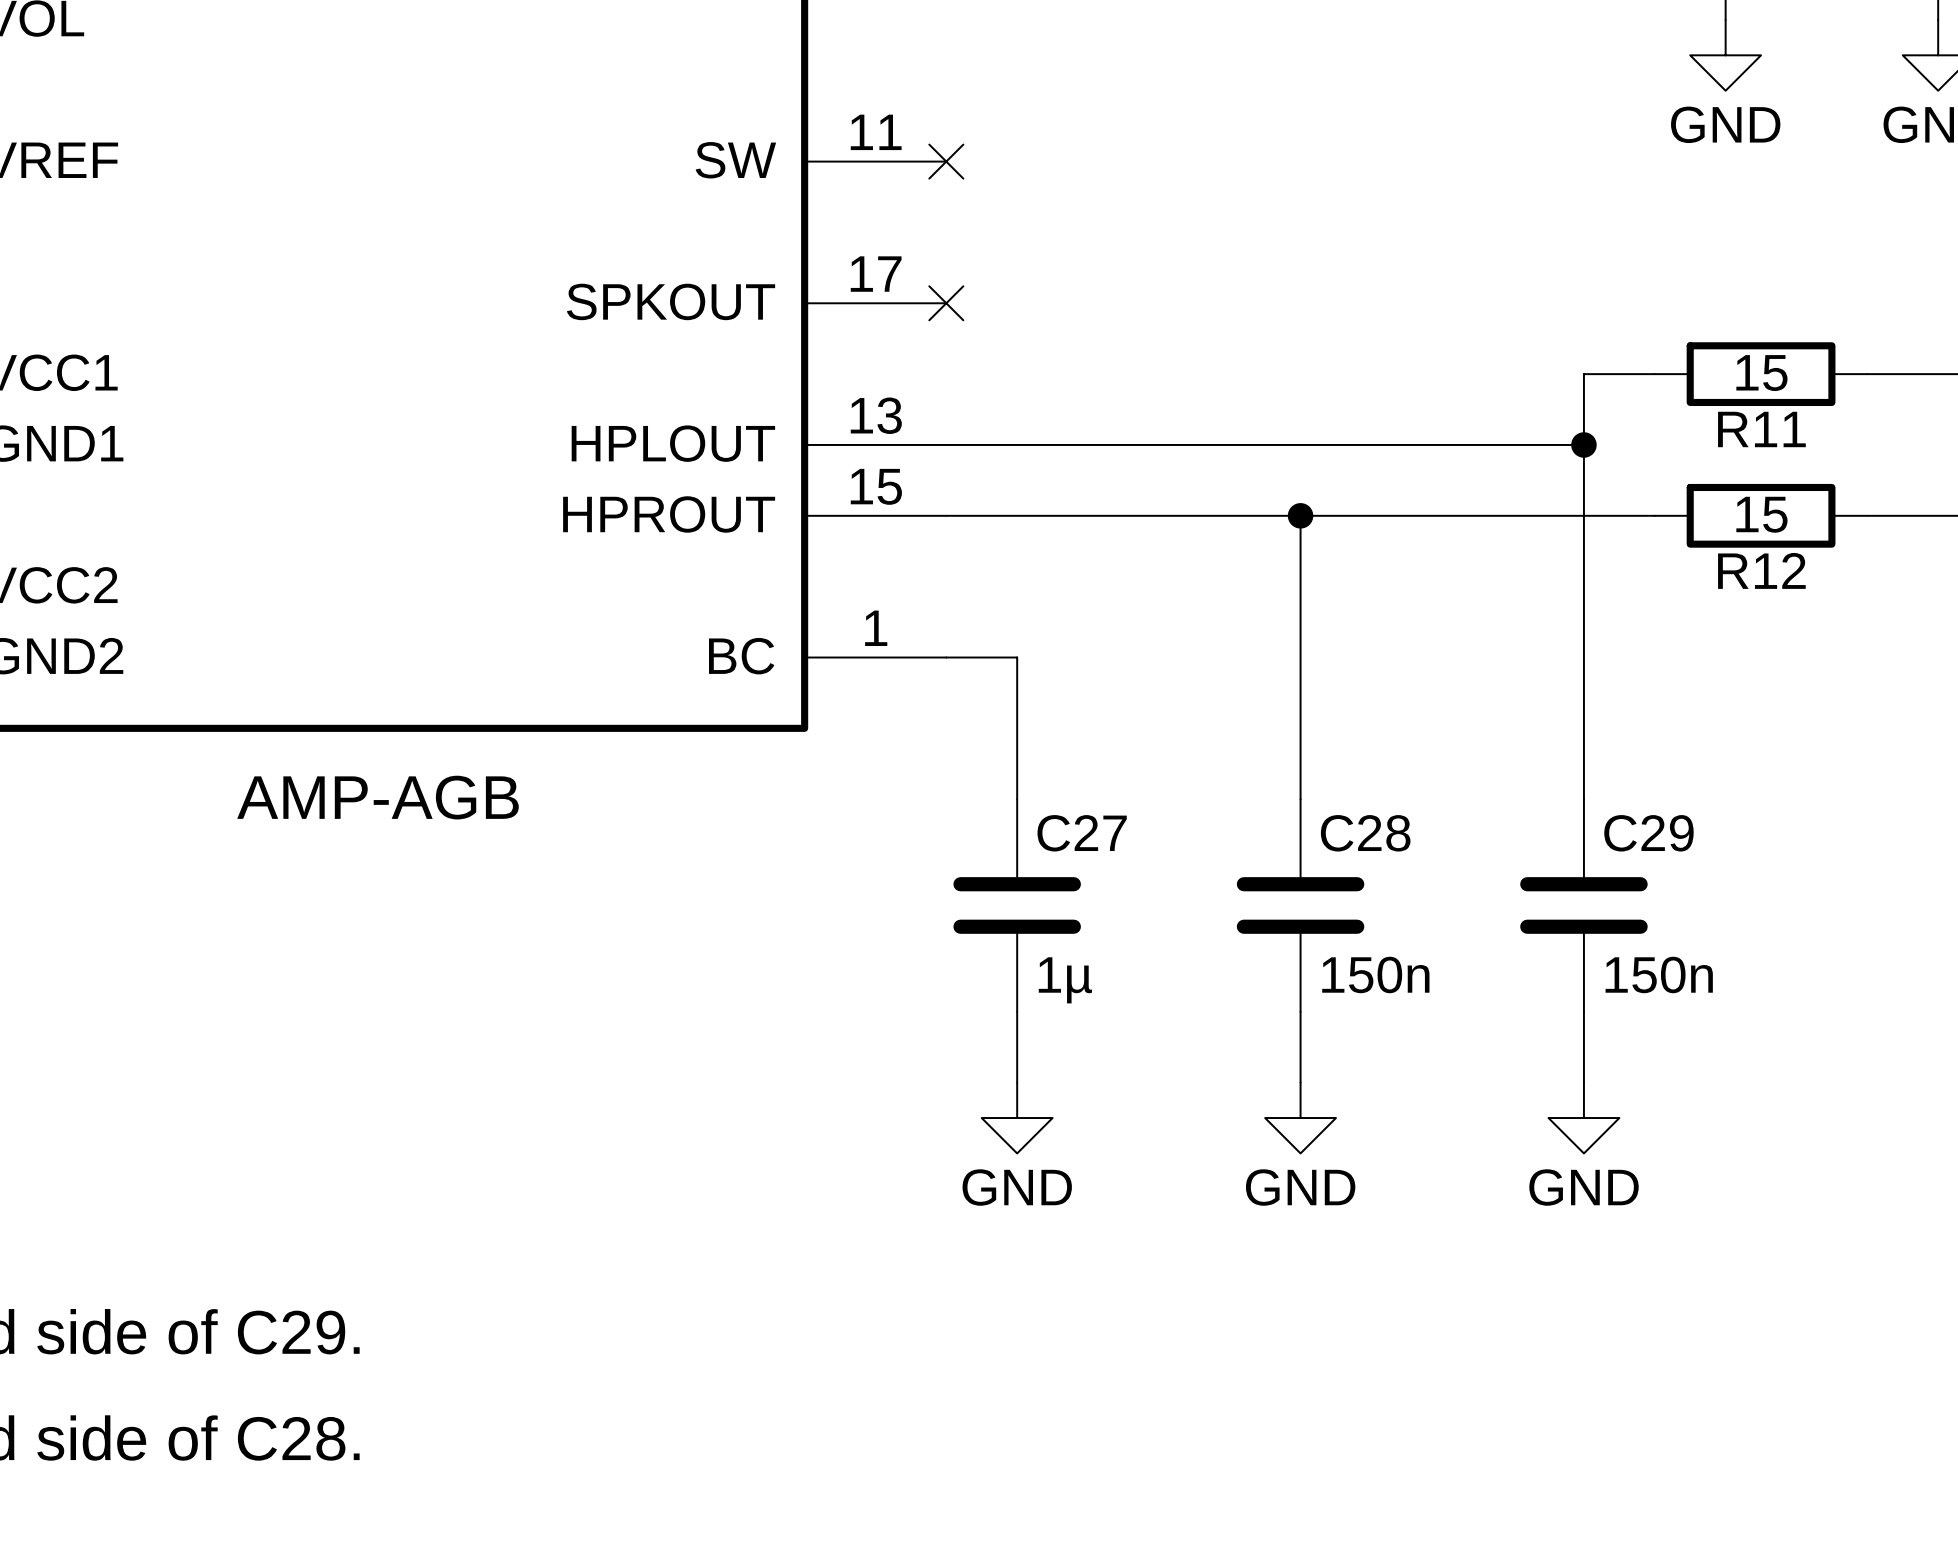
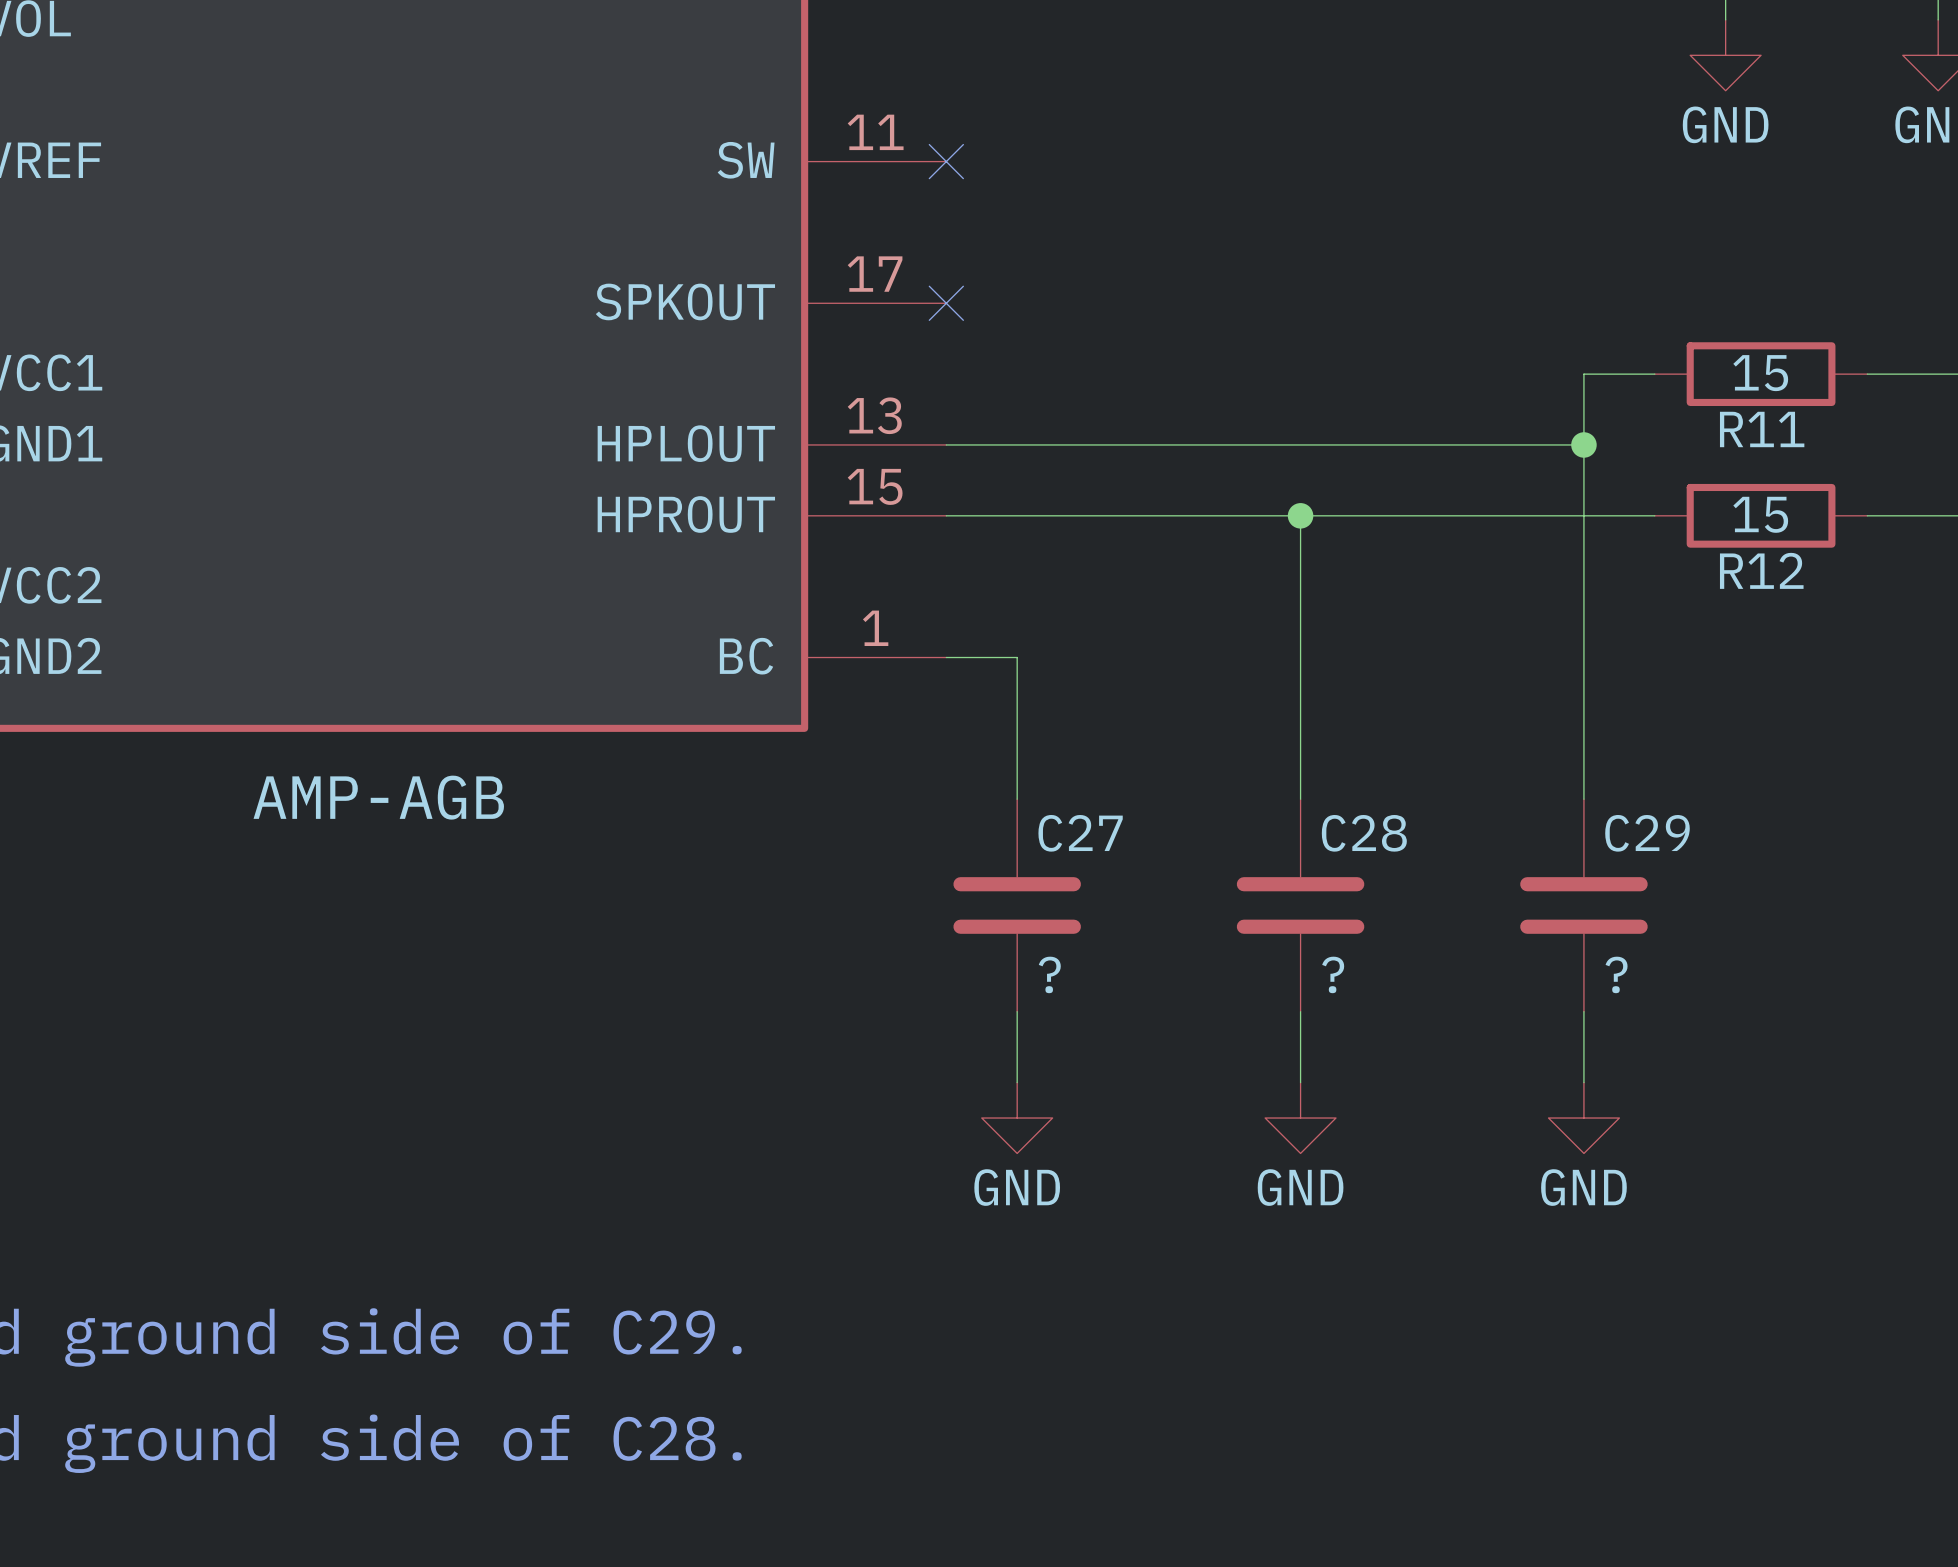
C28 value: 150n (1375, 974) -> ? (1333, 974)
C29 value: 150n (1659, 974) -> ? (1616, 974)
C27 value: 1µ (1065, 980) -> ? (1049, 974)

